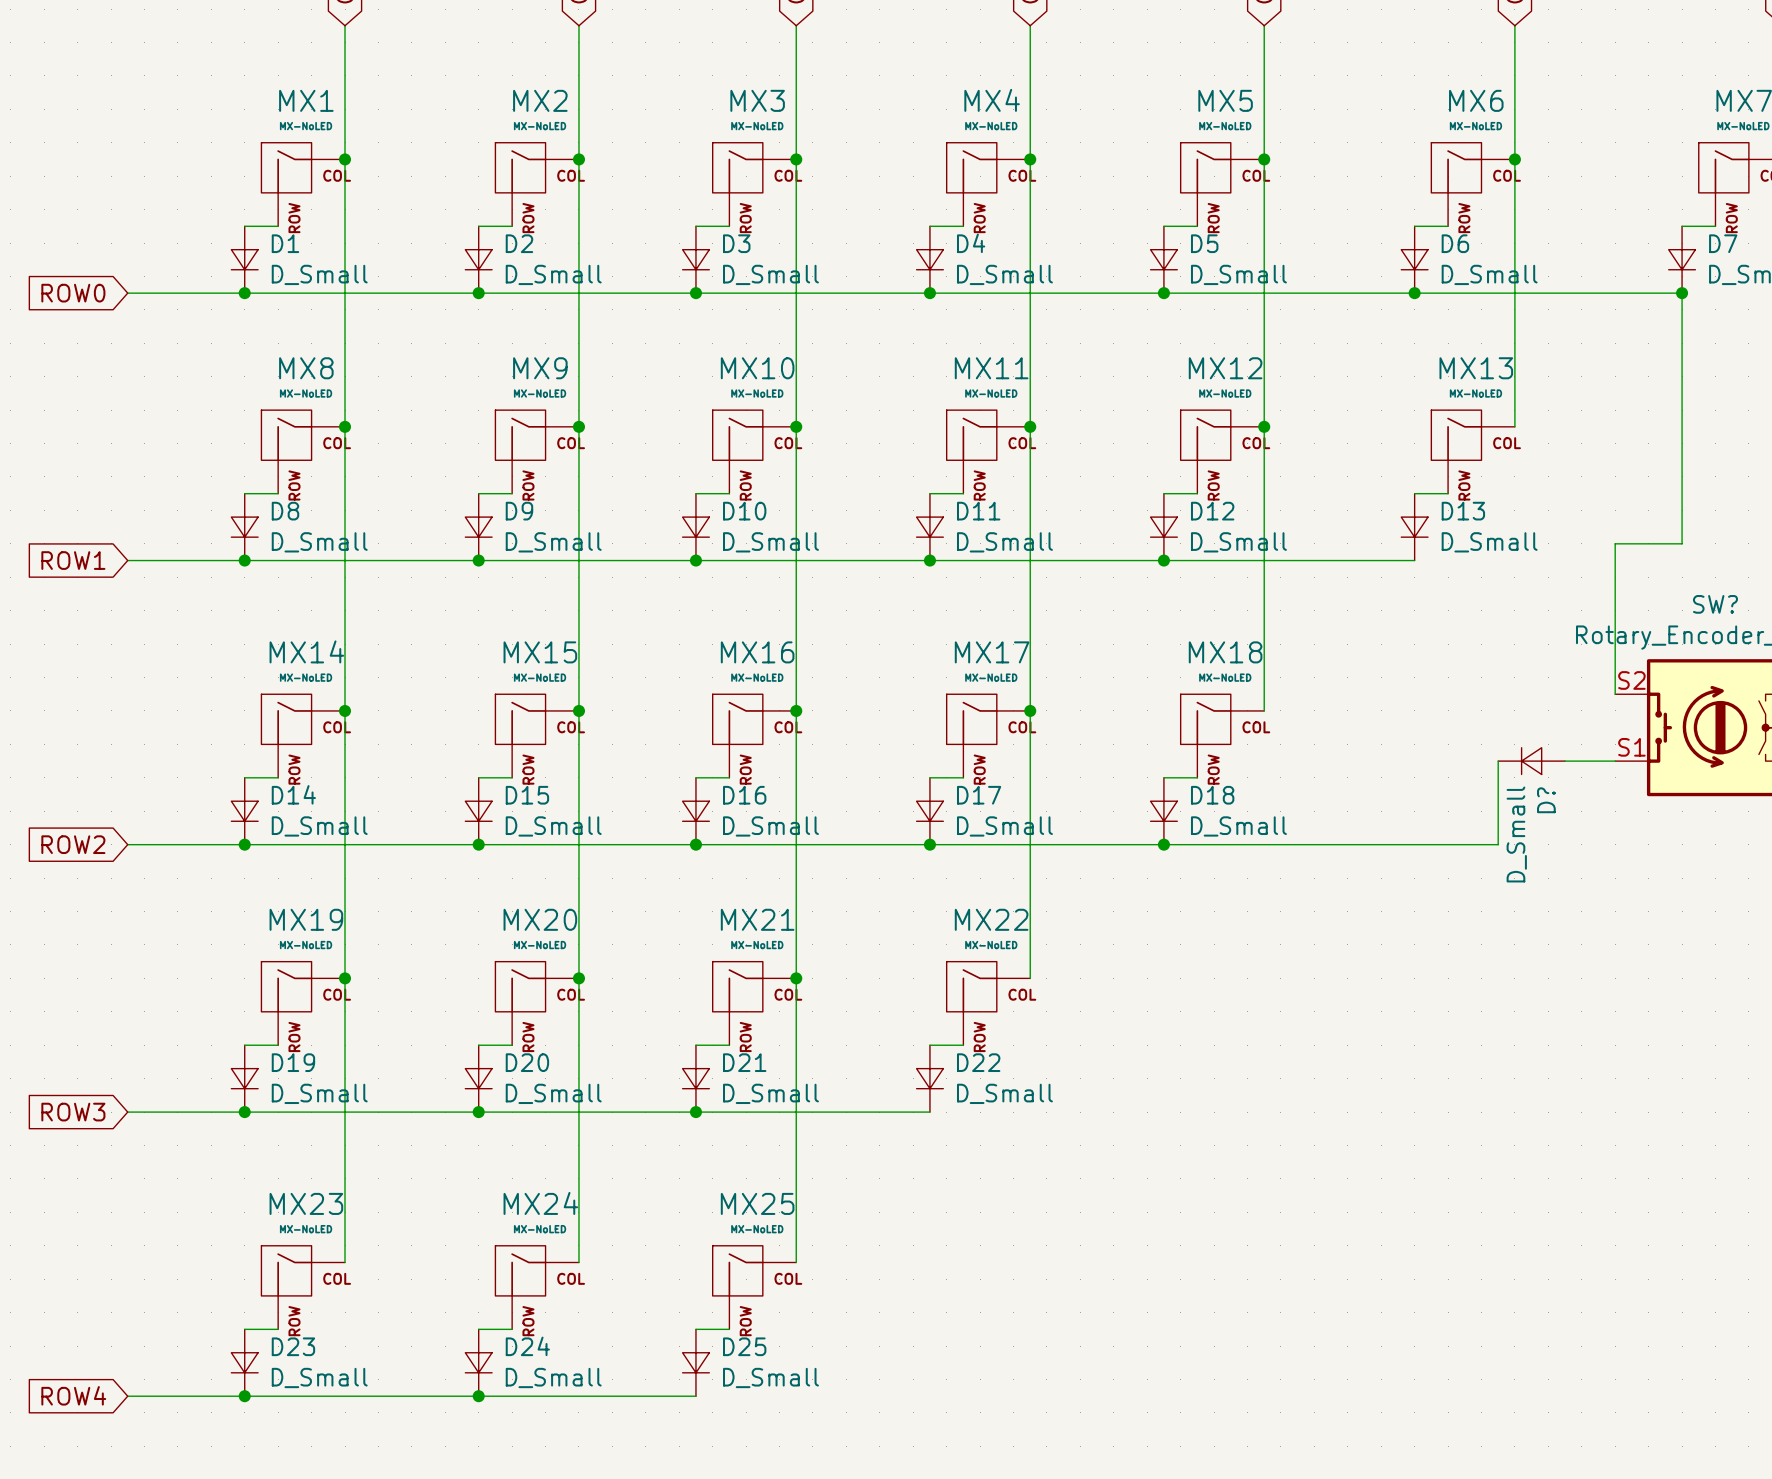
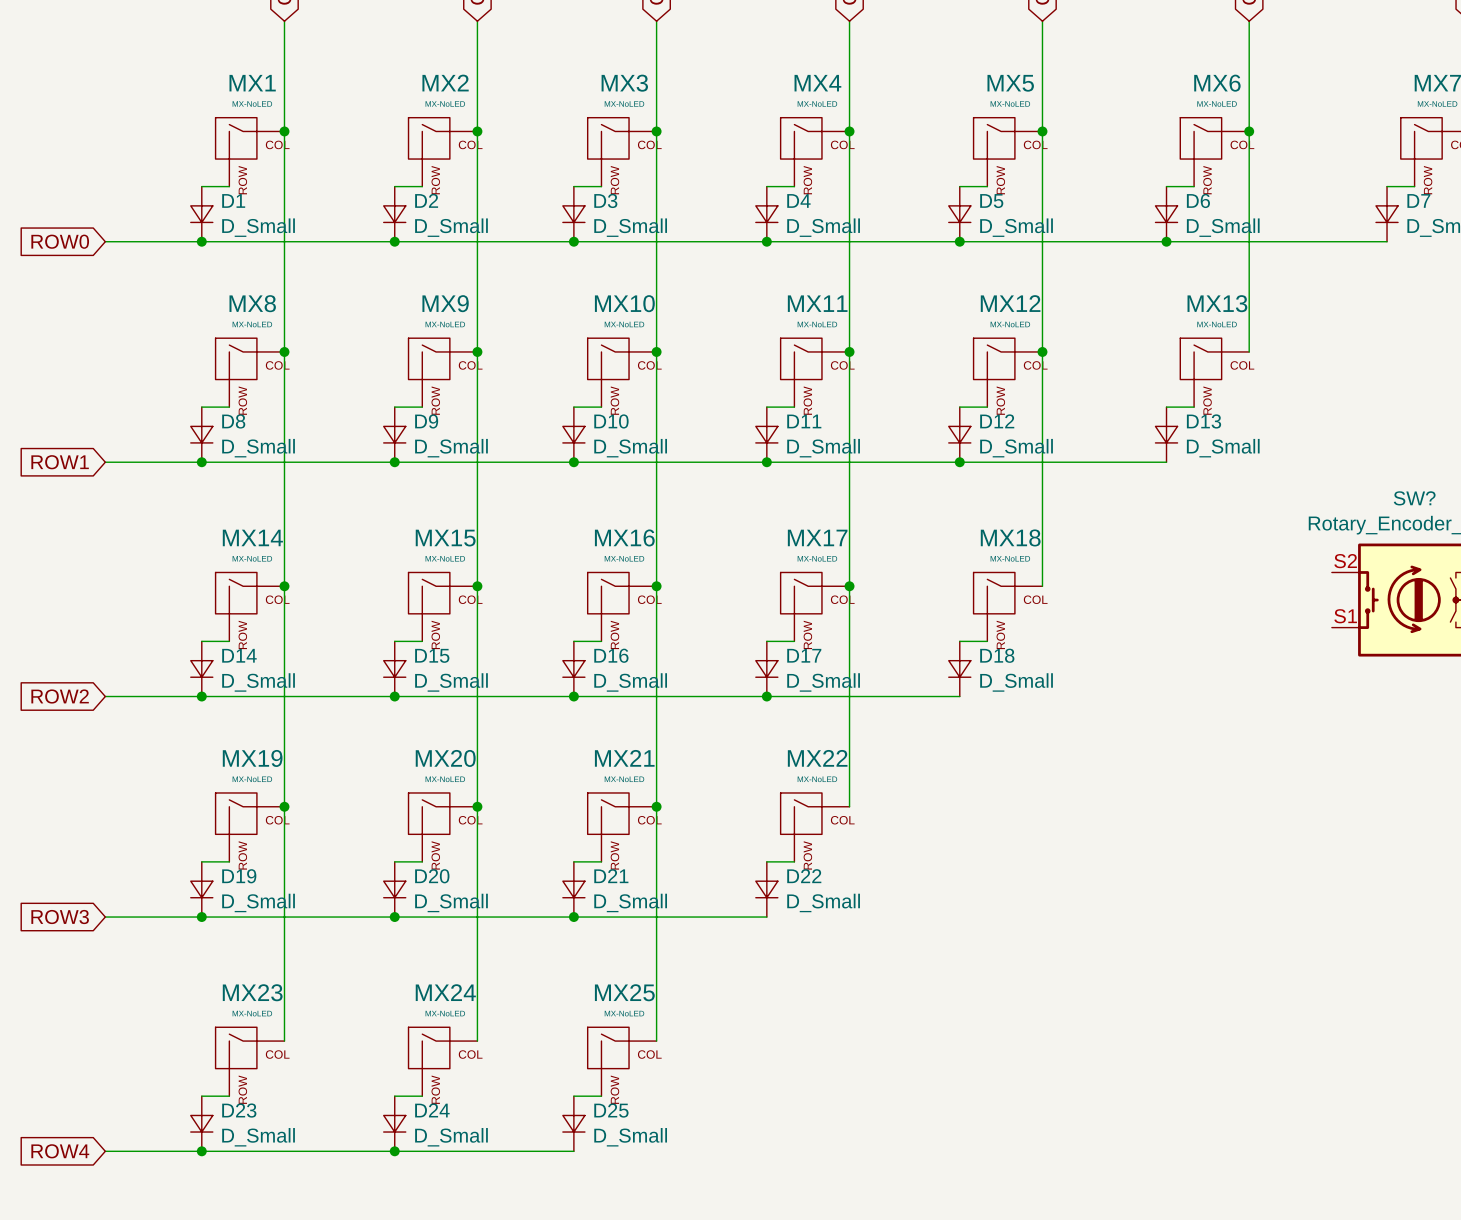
wire: (1682, 293) (1682, 543) (1615, 543) (1615, 694) -> none
junction: (1682, 293) -> none
wire: (1498, 761) (1498, 844) (1163, 844) -> none
D?: D_Small (1531, 761) -> none
wire: (1565, 761) (1615, 761) -> none
junction: (1163, 844) -> none

